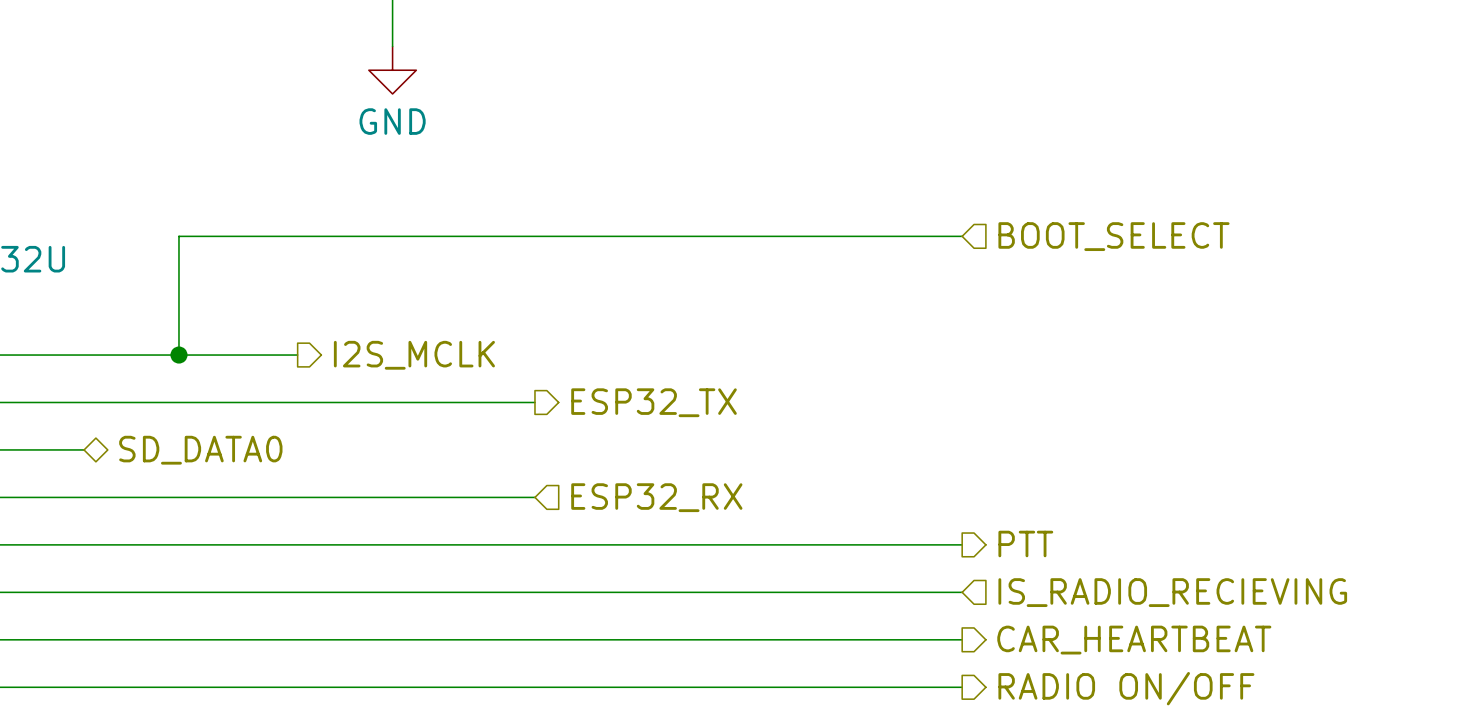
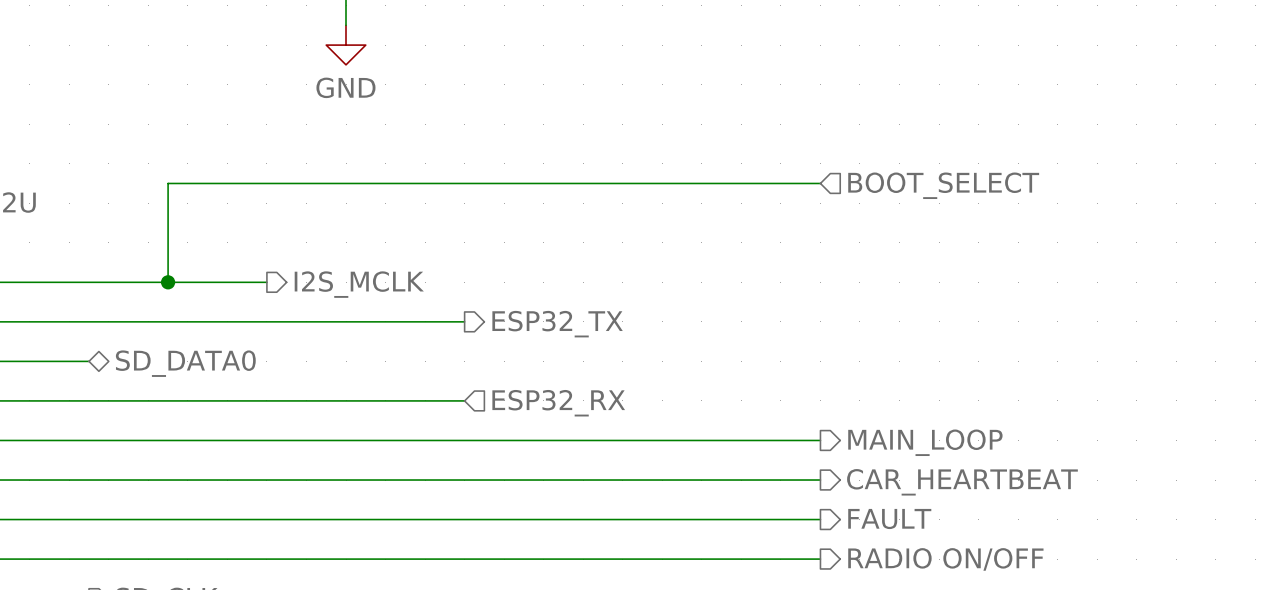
hierarchical label: PTT (1025, 544) -> MAIN_LOOP (925, 442)
hierarchical label shape: input (1172, 592) -> output (962, 482)
hierarchical label: IS_RADIO_RECIEVING (1172, 592) -> CAR_HEARTBEAT (962, 482)
hierarchical label: CAR_HEARTBEAT (1134, 640) -> FAULT (889, 519)

